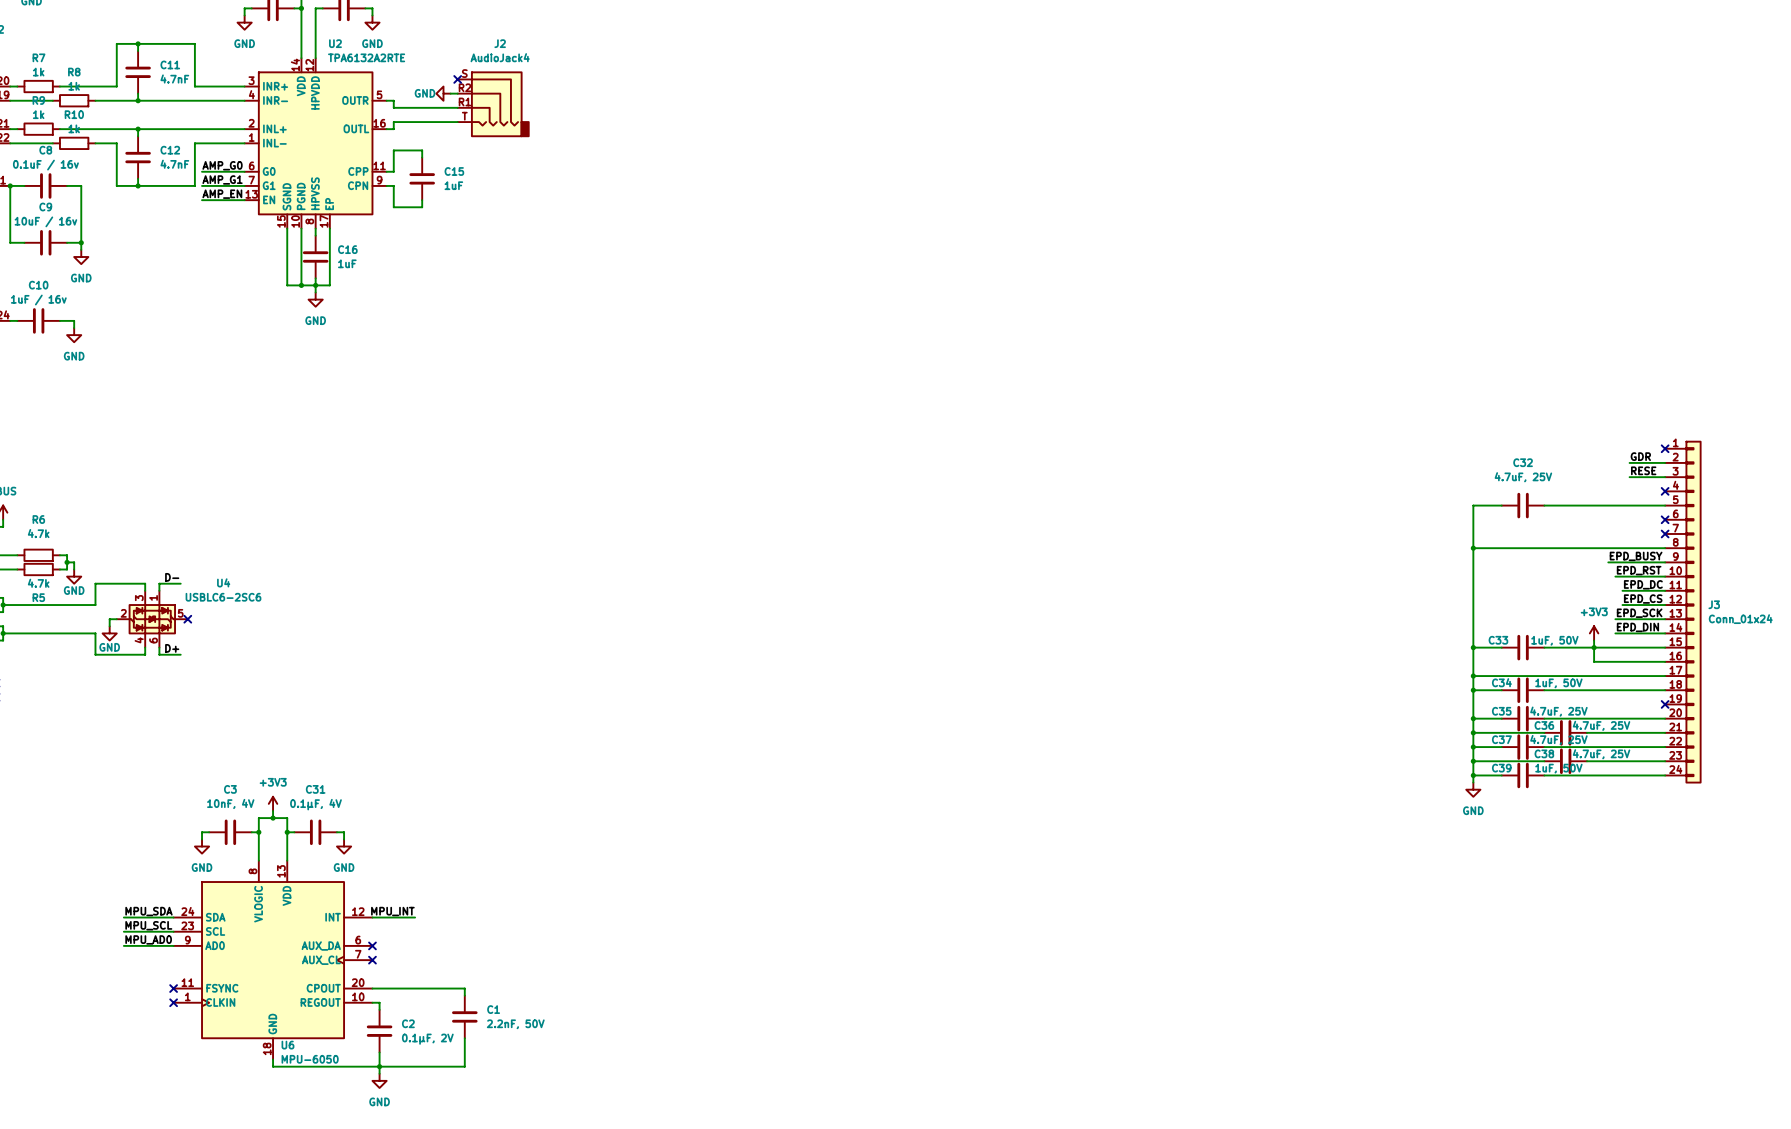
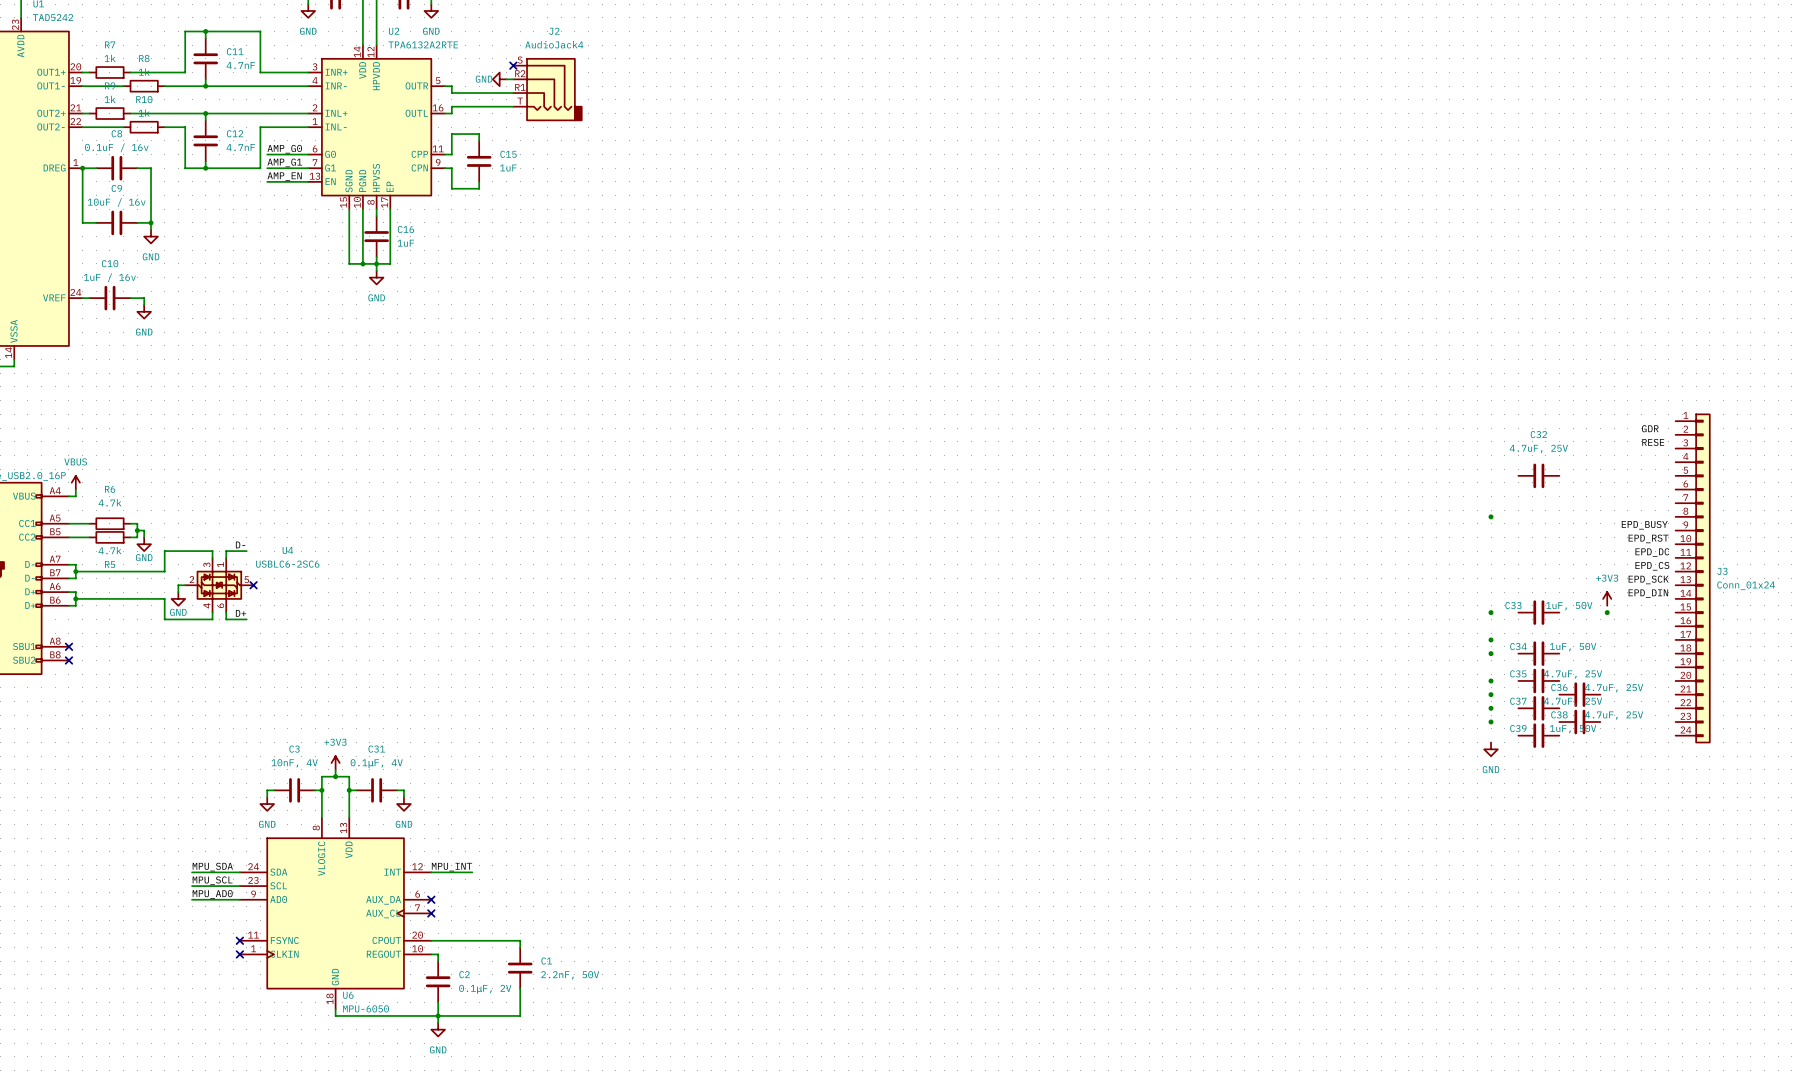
no-connect mark: (1665, 448) -> none
wire: (1629, 462) (1665, 462) -> none
wire: (1629, 477) (1665, 477) -> none
no-connect mark: (1665, 491) -> none
wire: (1501, 505) (1473, 505) (1473, 782) -> none
wire: (1544, 505) (1665, 505) -> none
no-connect mark: (1665, 519) -> none
no-connect mark: (1665, 533) -> none
wire: (1473, 548) (1665, 548) -> none
wire: (1608, 562) (1665, 562) -> none
wire: (1615, 576) (1665, 576) -> none
wire: (1622, 590) (1665, 590) -> none
wire: (1622, 605) (1665, 605) -> none
wire: (1615, 619) (1665, 619) -> none
wire: (1615, 633) (1665, 633) -> none
wire: (1594, 640) (1594, 661) (1665, 661) -> none
wire: (1473, 647) (1501, 647) -> none
wire: (1544, 647) (1665, 647) -> none
wire: (1473, 676) (1665, 676) -> none
wire: (1473, 690) (1501, 690) -> none
wire: (1544, 690) (1665, 690) -> none
no-connect mark: (1665, 704) -> none
wire: (1473, 718) (1501, 718) -> none
wire: (1544, 718) (1665, 718) -> none
wire: (1473, 732) (1544, 732) -> none
wire: (1586, 732) (1665, 732) -> none
wire: (1473, 747) (1501, 747) -> none
wire: (1544, 747) (1665, 747) -> none
wire: (1473, 761) (1544, 761) -> none
wire: (1586, 761) (1665, 761) -> none
wire: (1473, 775) (1501, 775) -> none
junction: (1473, 775) -> none
wire: (1544, 775) (1665, 775) -> none

